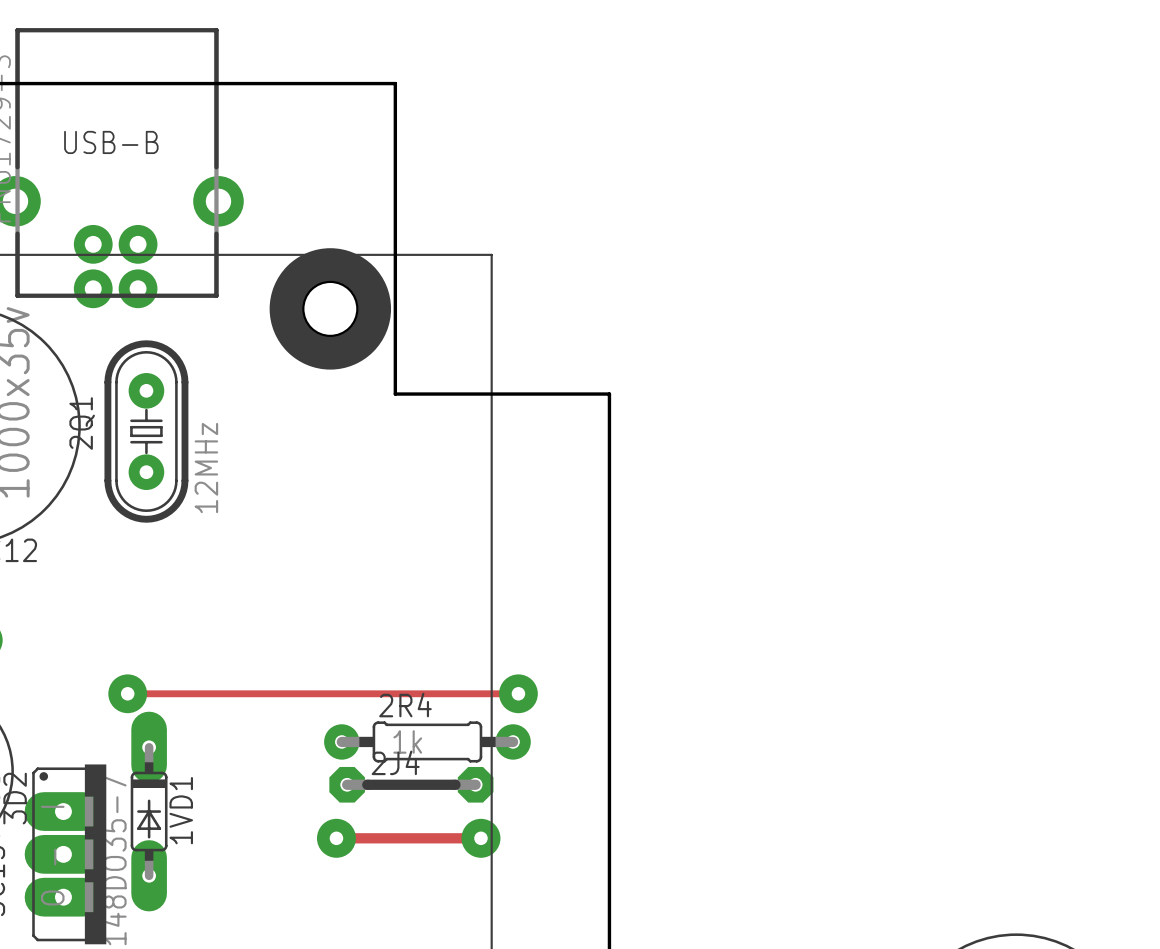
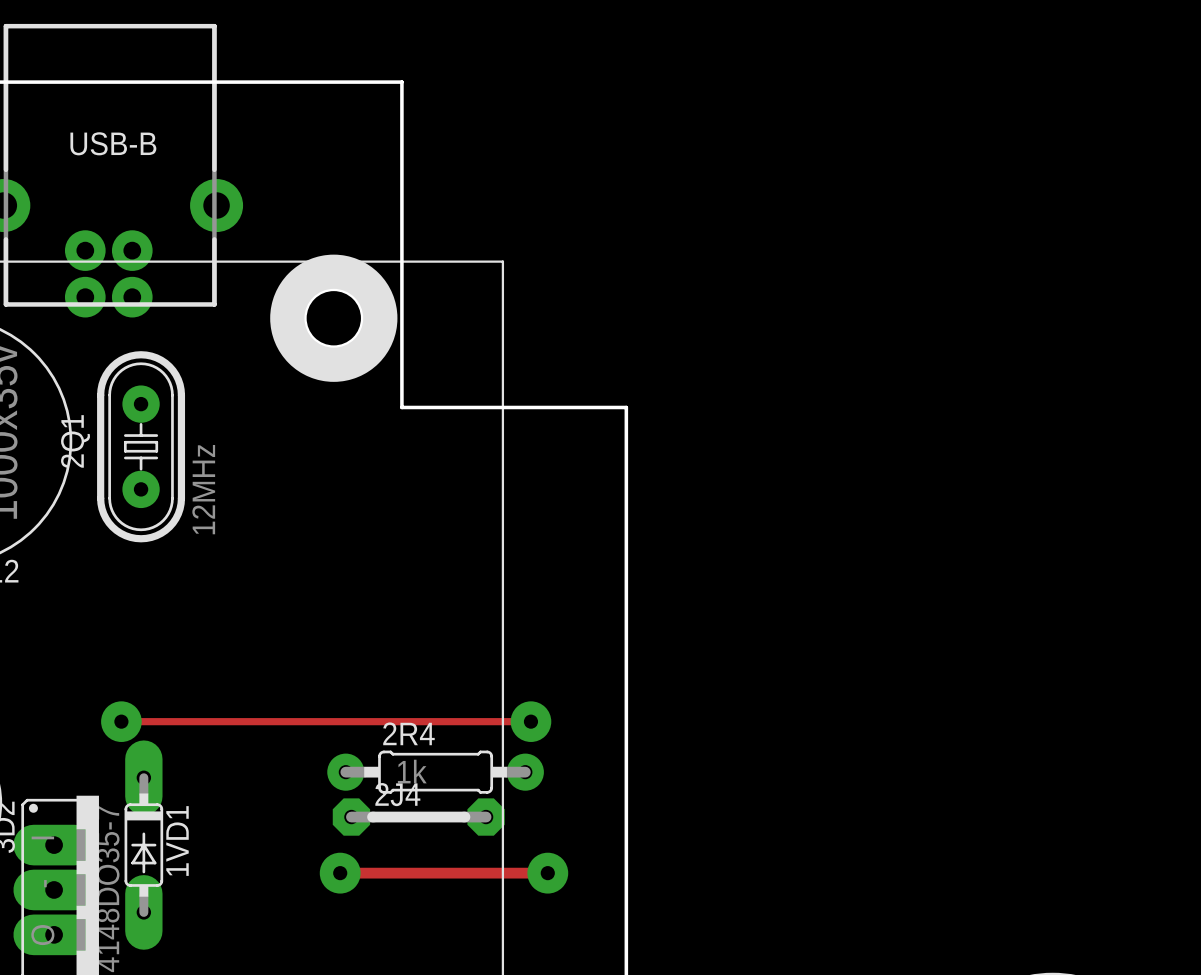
track: none -> (491, 873) (547, 873)
via position: (480, 838) -> (547, 873)

